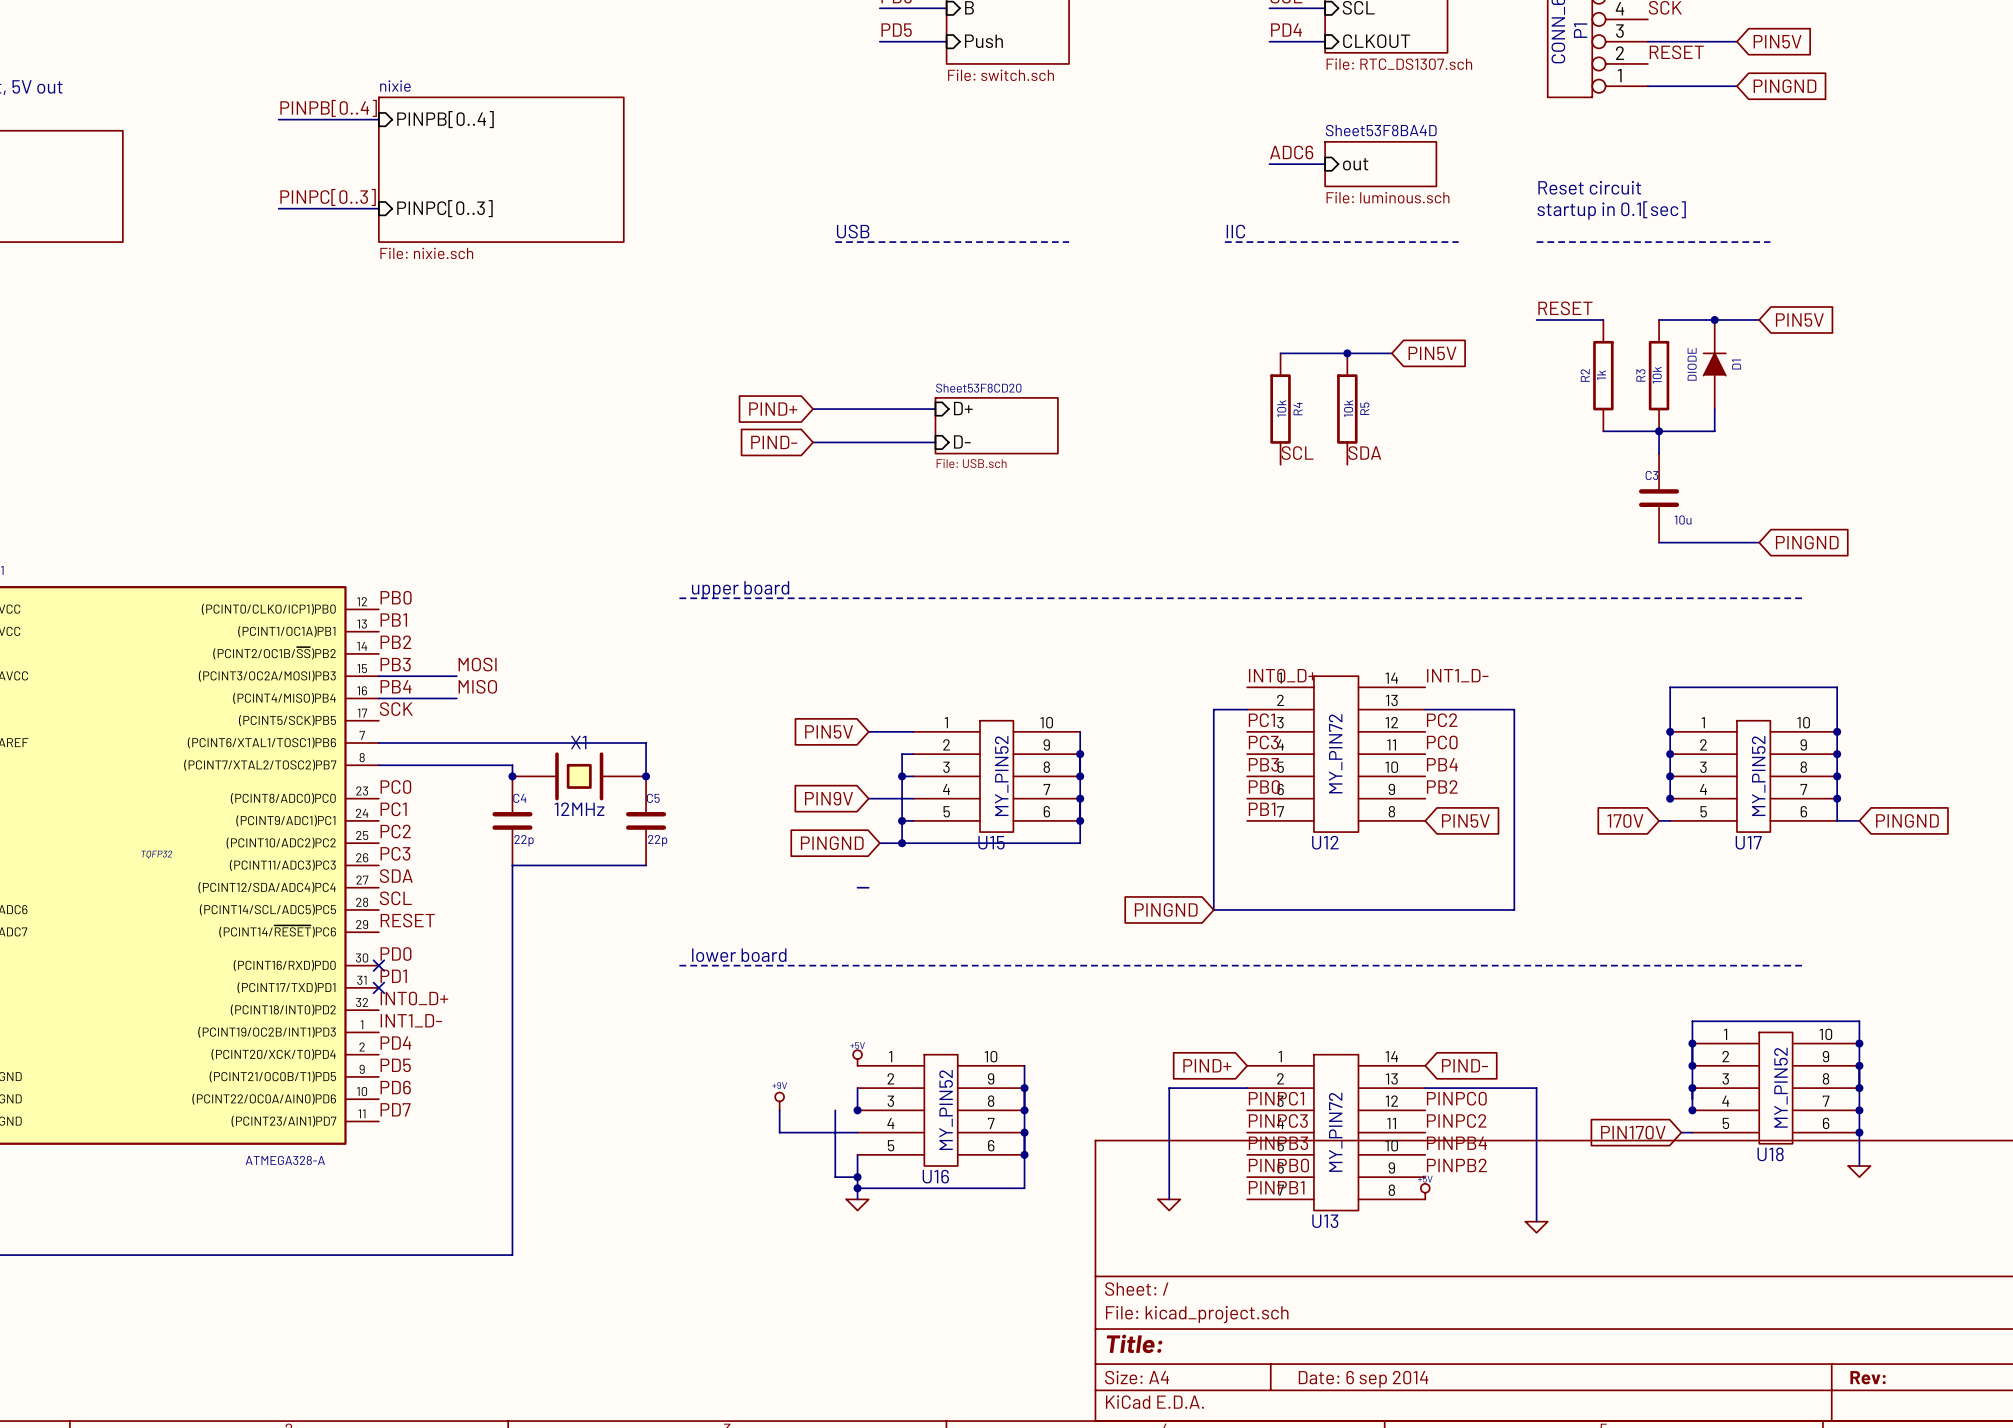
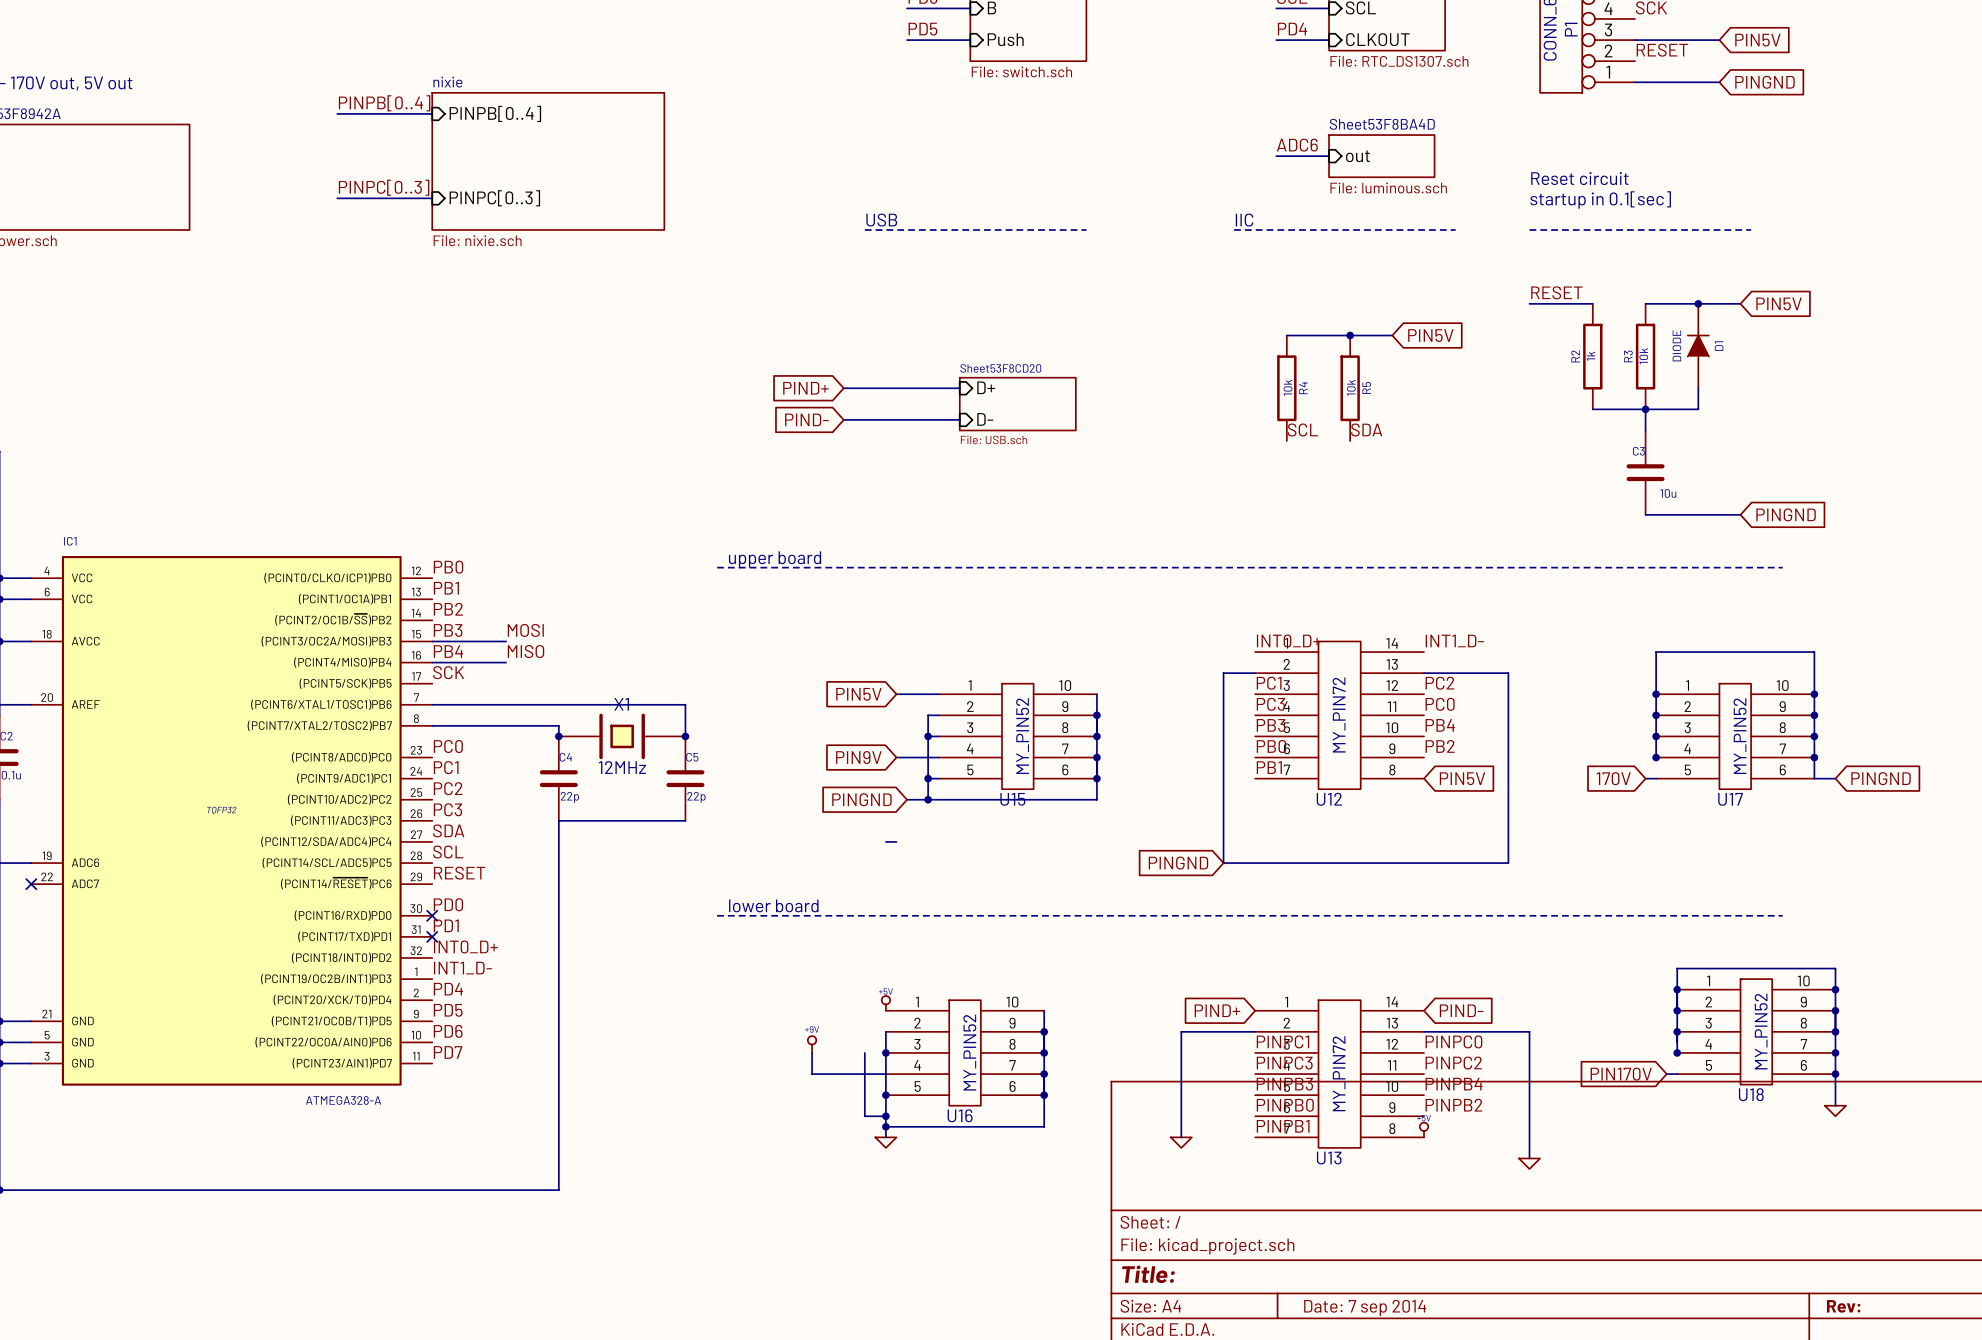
wire: none -> (885, 1052) (885, 1095)
junction: none -> (885, 1095)
title block: Date: 6 sep 2014 (1363, 1379) -> Date: 7 sep 2014 (1365, 1307)

